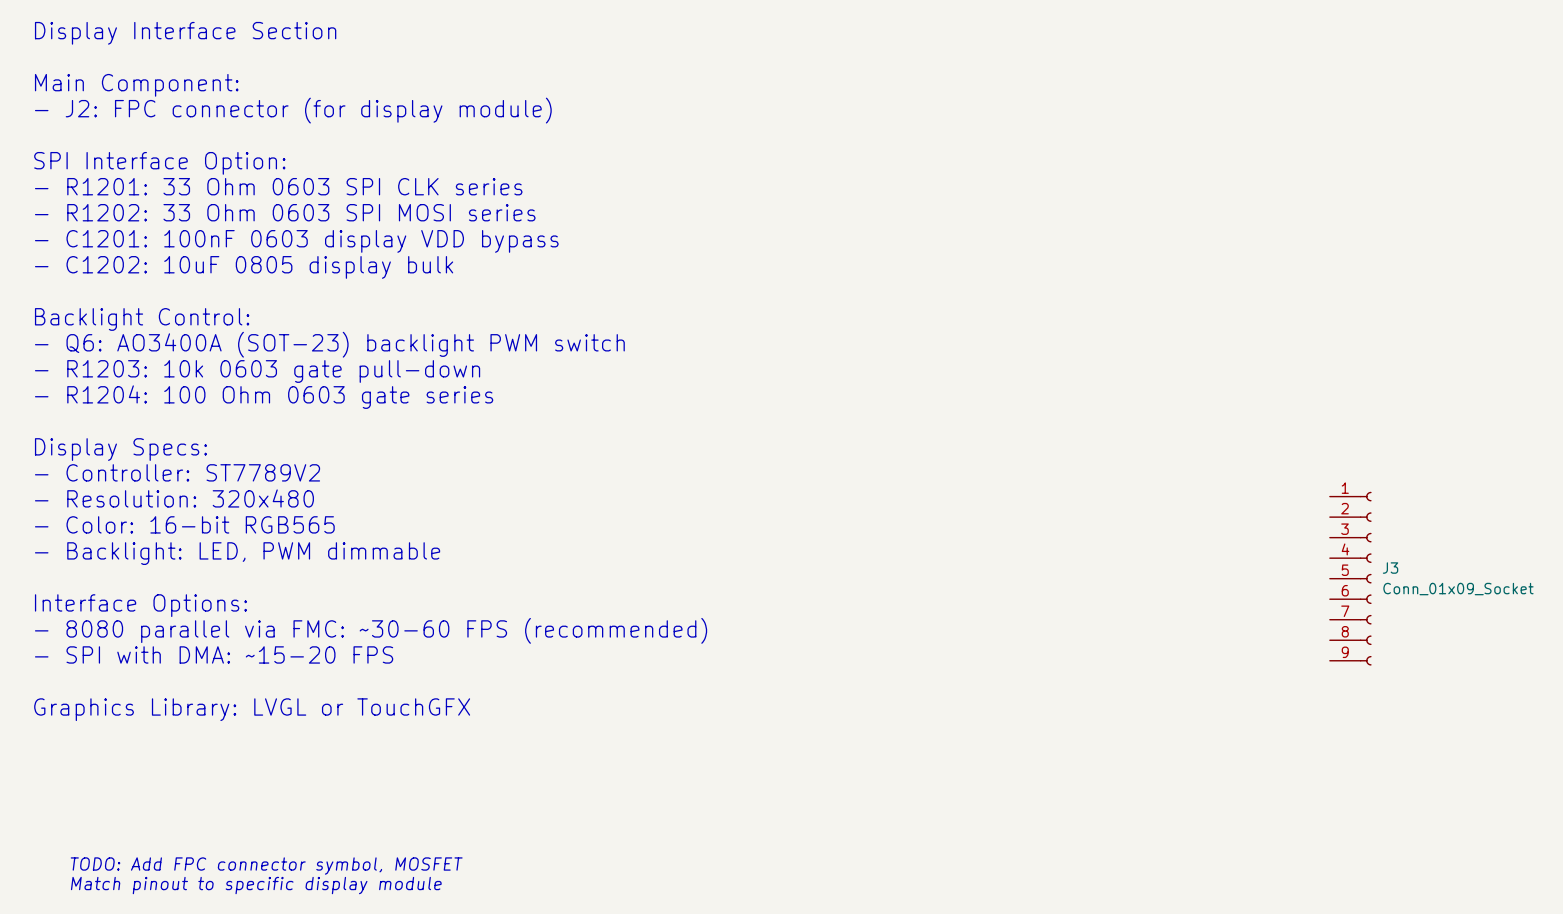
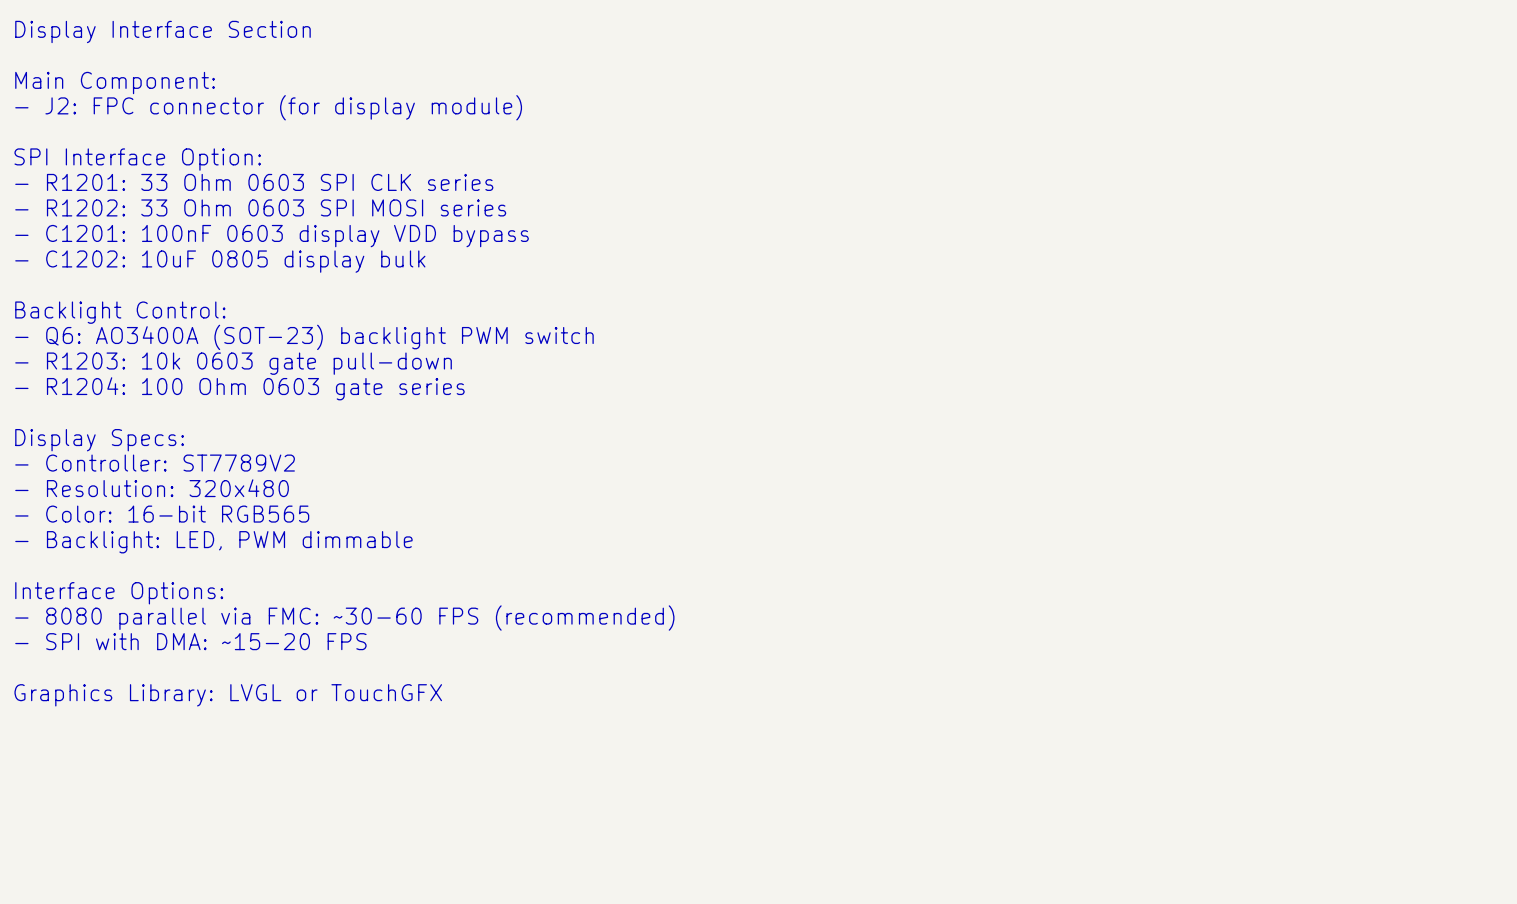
J3: Conn_01x09_Socket (1350, 578) -> none
text: TODO: Add FPC connector symbol, MOSFET (266, 866) -> none
text: Match pinout to specific display module (256, 885) -> none

